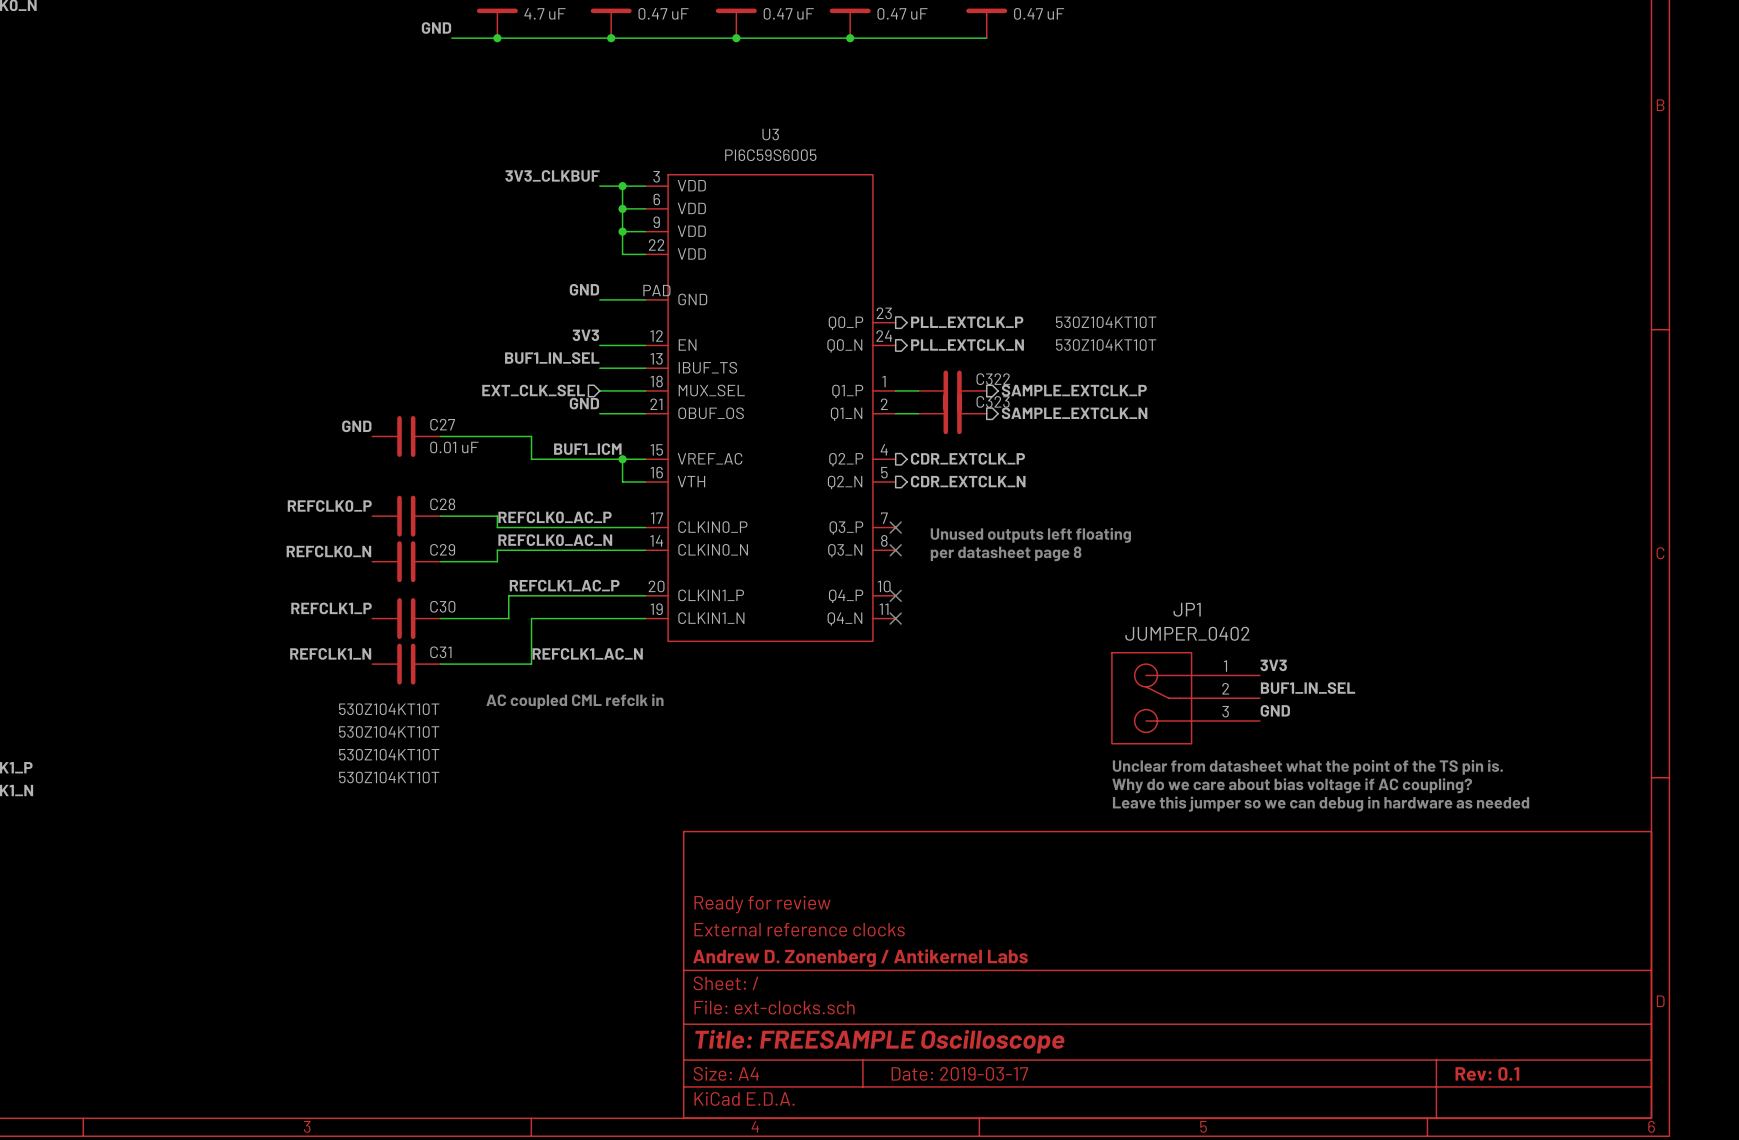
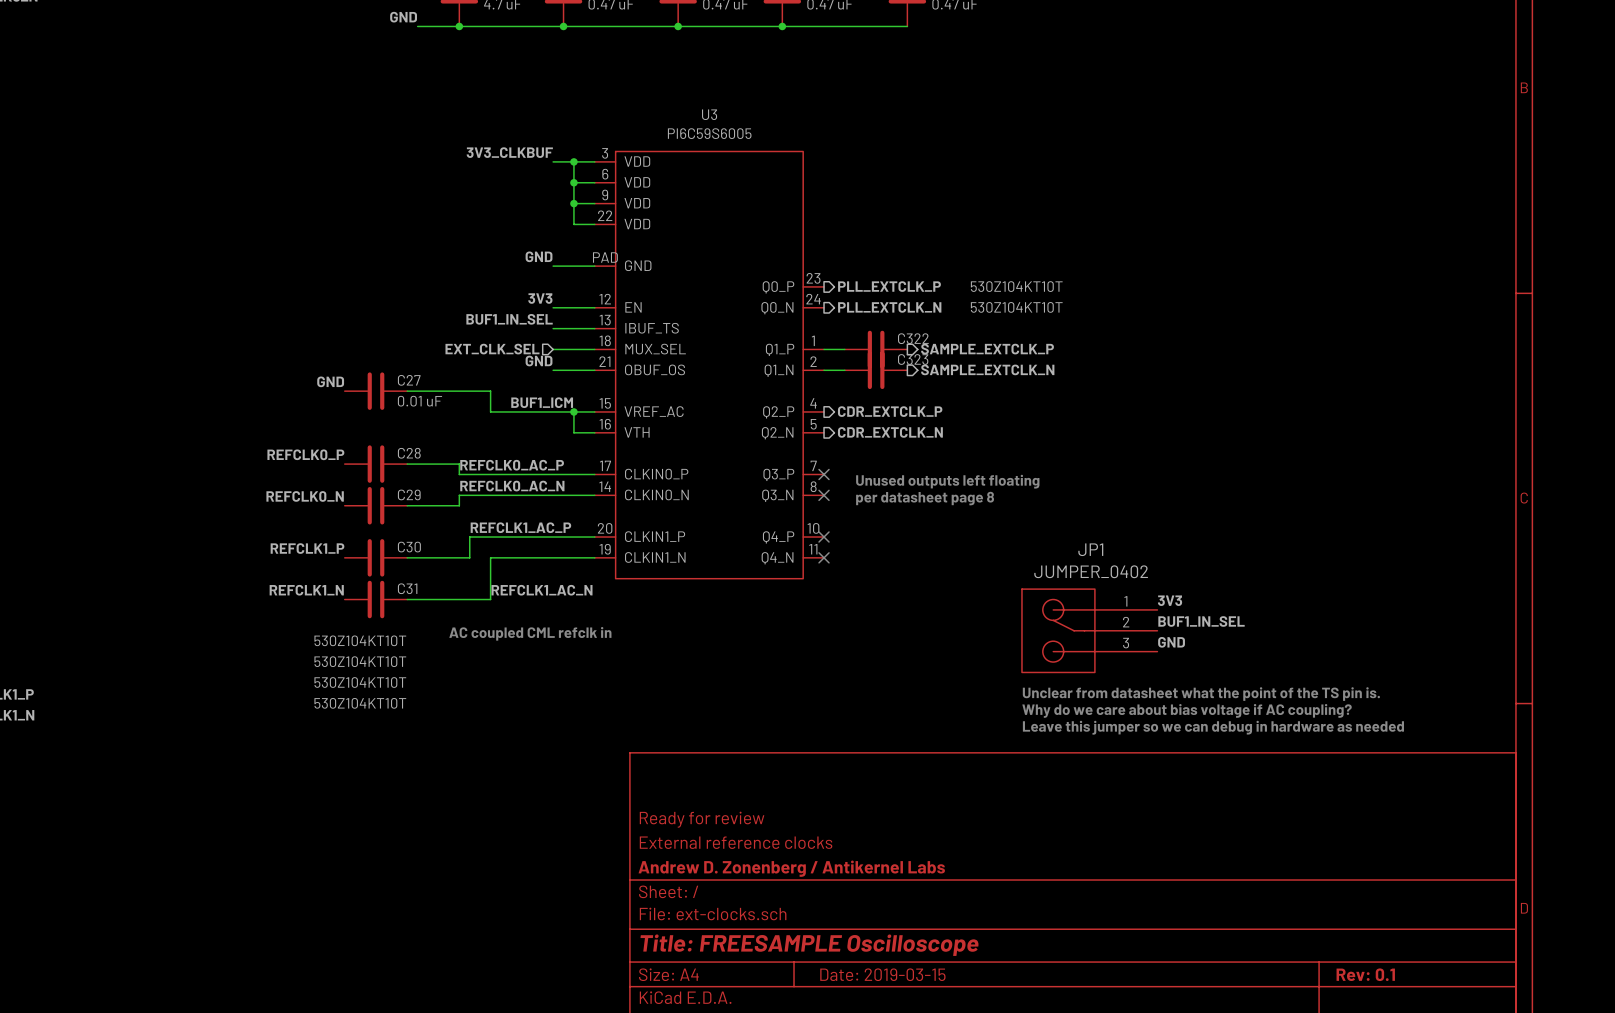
title block: Date: 2019-03-17 (959, 1073) -> Date: 2019-03-15 (882, 974)

